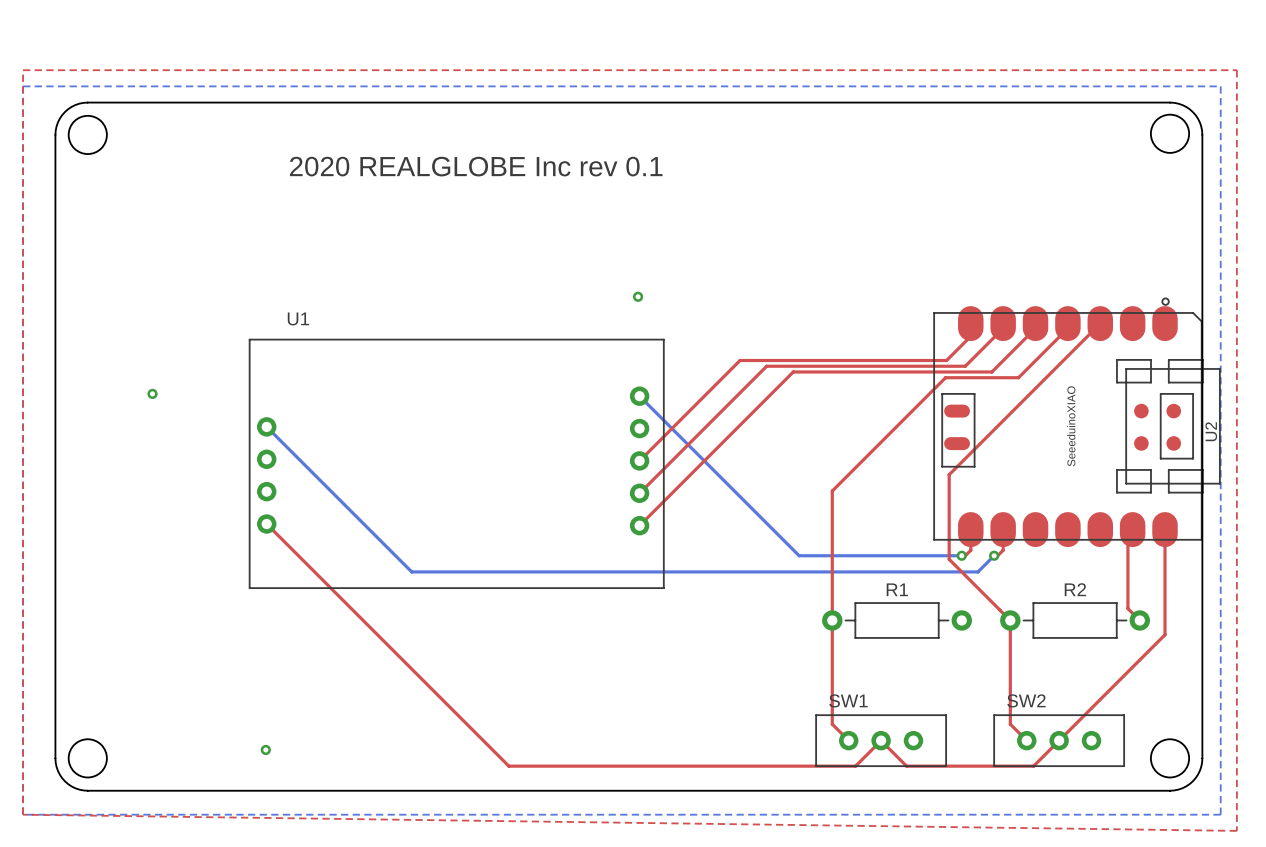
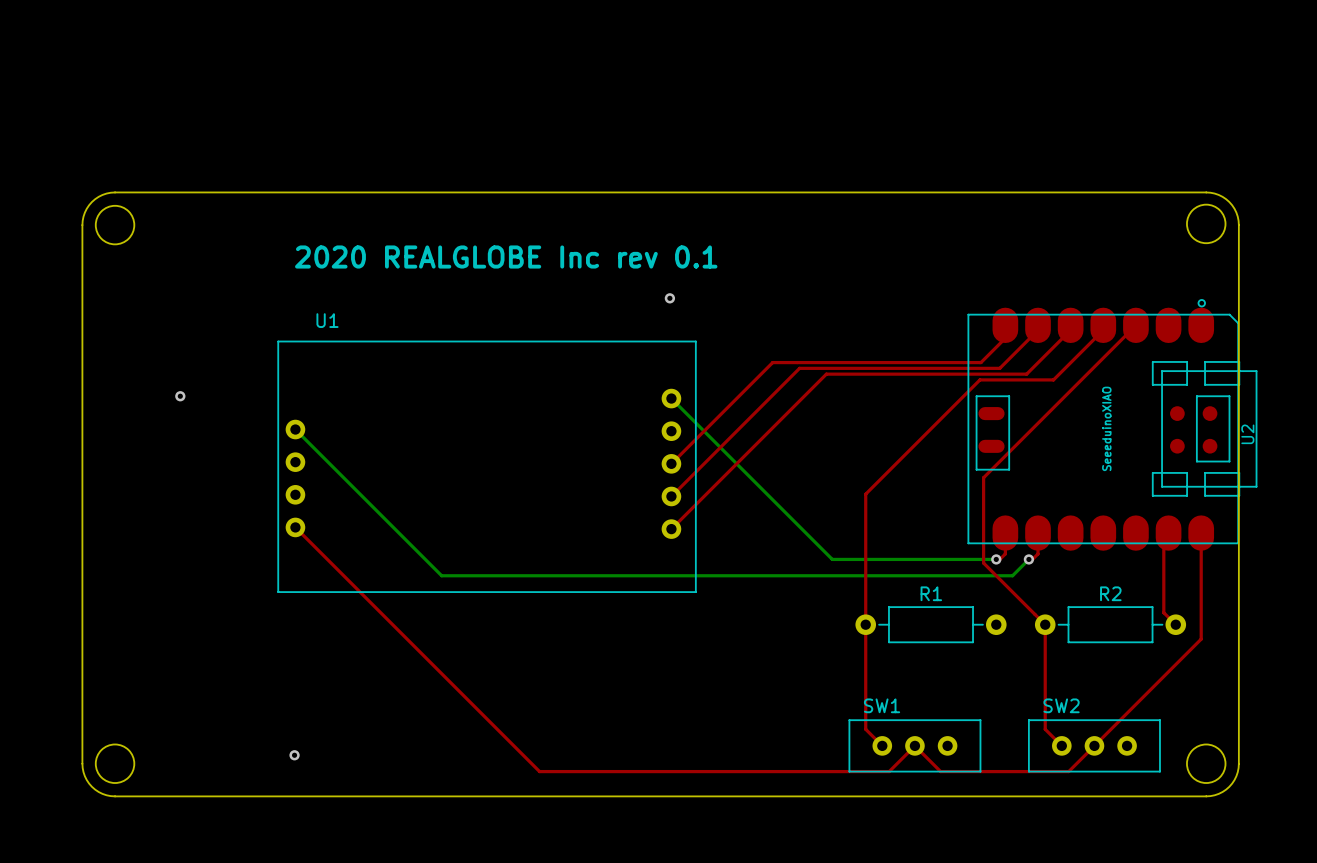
top zone outline: (23, 70) (23, 814) (1236, 830) (1236, 70) (23, 70) -> none
bottom zone outline: (23, 86) (23, 814) (1220, 814) (1220, 86) (23, 86) -> none
round board edge position: (1170, 133) -> (1206, 223)
round board edge position: (87, 134) -> (115, 225)
text position: 2020 REALGLOBE Inc rev 0.1 (476, 166) -> 2020 REALGLOBE Inc rev 0.1 (506, 257)
board edge: (55, 224) (56, 126) (59, 118) (68, 109) (79, 103) (87, 102) (1174, 102) (1189, 109) (1195, 115) (1201, 126) (1202, 224) -> (82, 225) (84, 212) (91, 202) (102, 194) (115, 192) (1206, 192) (1218, 194) (1229, 202) (1236, 212) (1238, 225)

